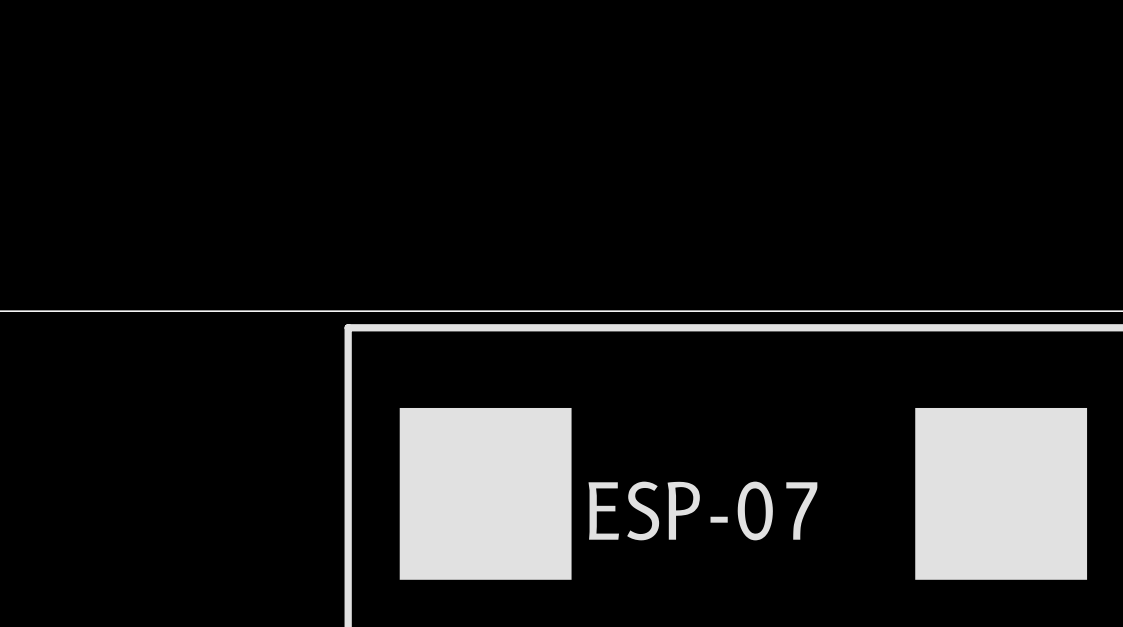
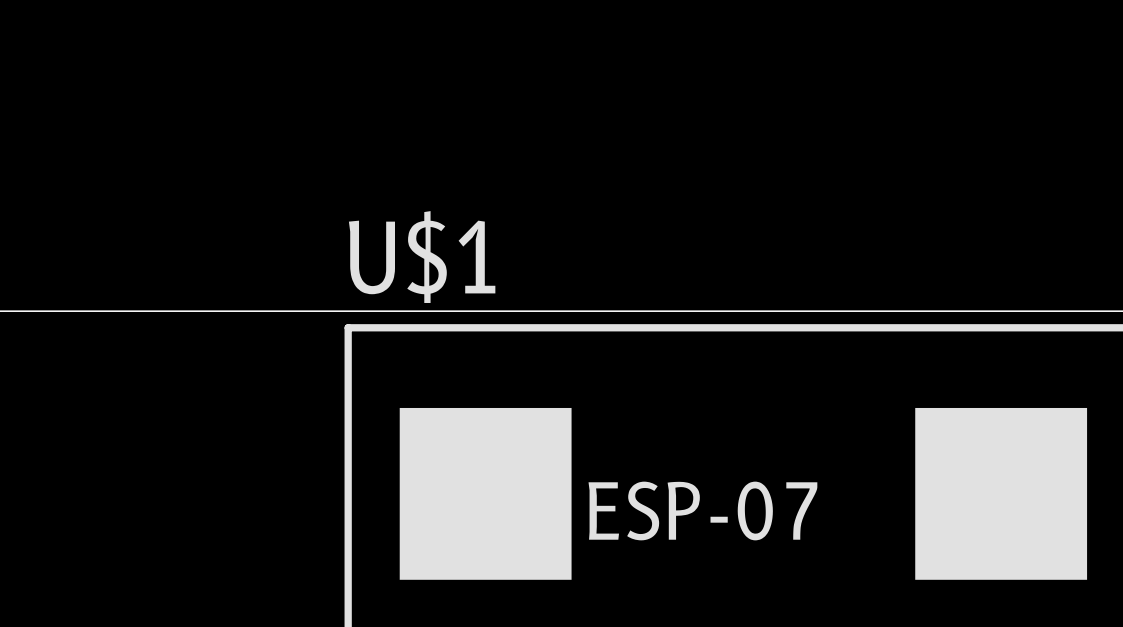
U$1 name: none -> U$1 (422, 257)

